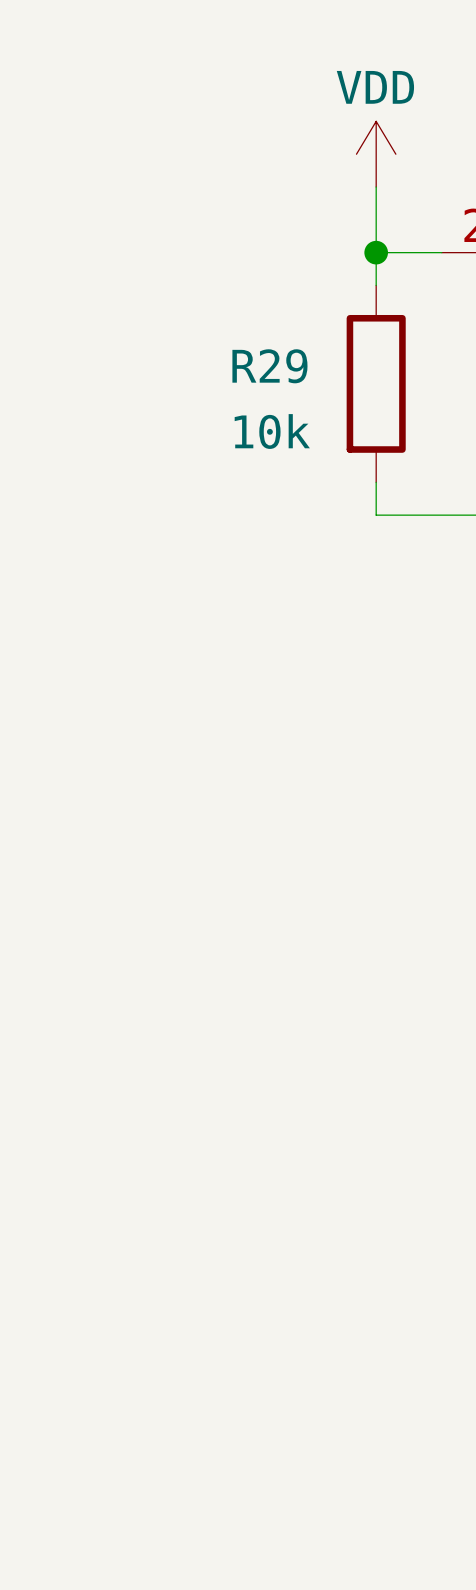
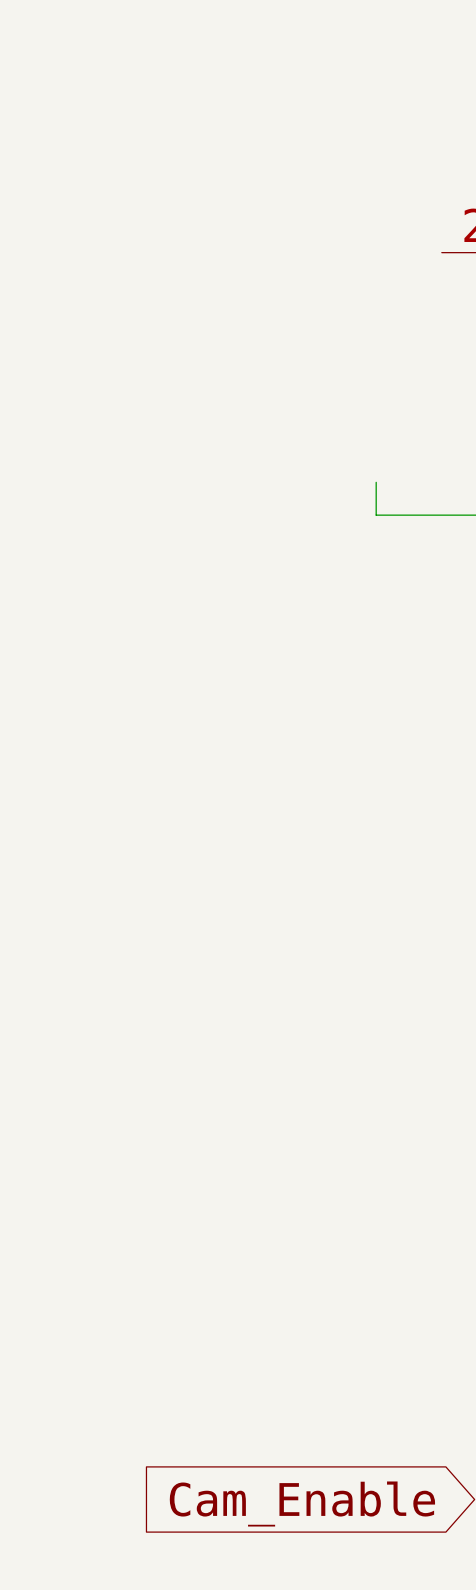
power symbol: VDD (376, 154) -> none
wire: (376, 187) (376, 285) -> none
wire: (376, 252) (441, 252) -> none
junction: (376, 252) -> none
R29: 10k (376, 383) -> none
global label: none -> Cam_Enable (302, 1504)

